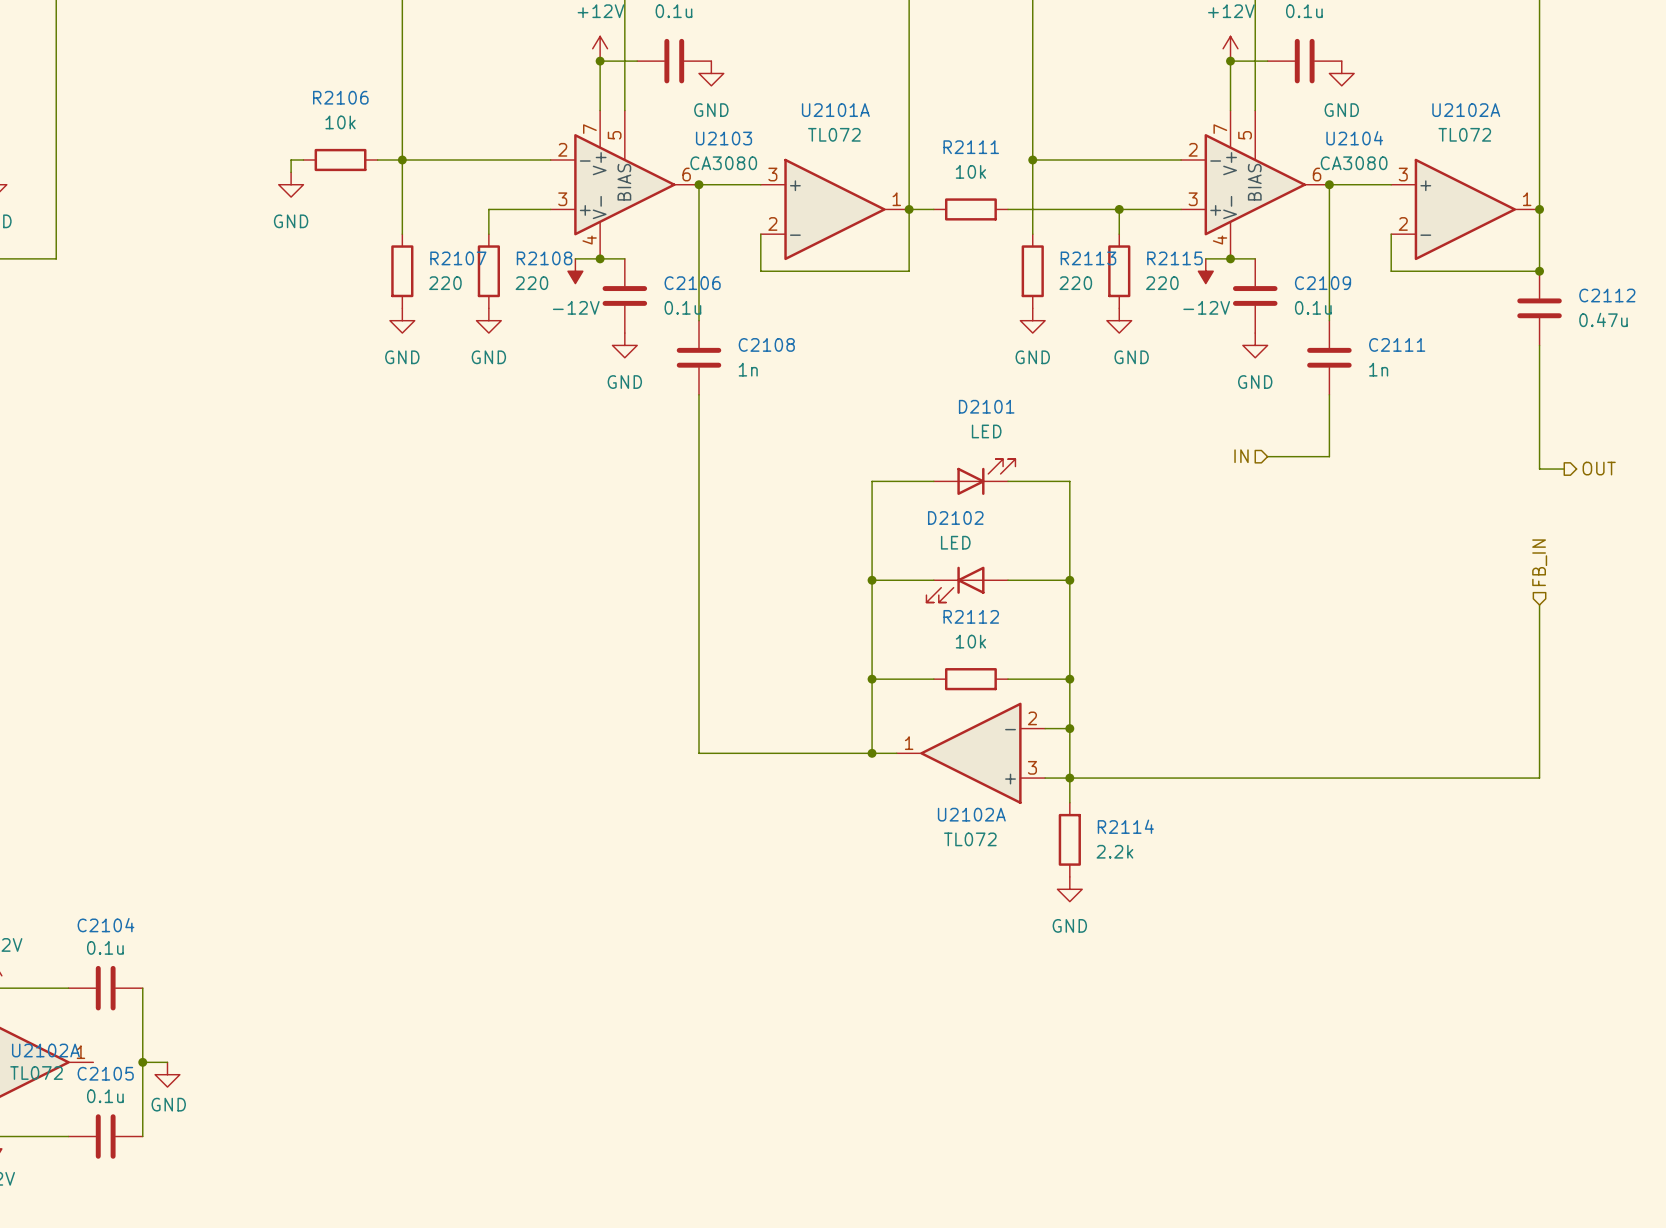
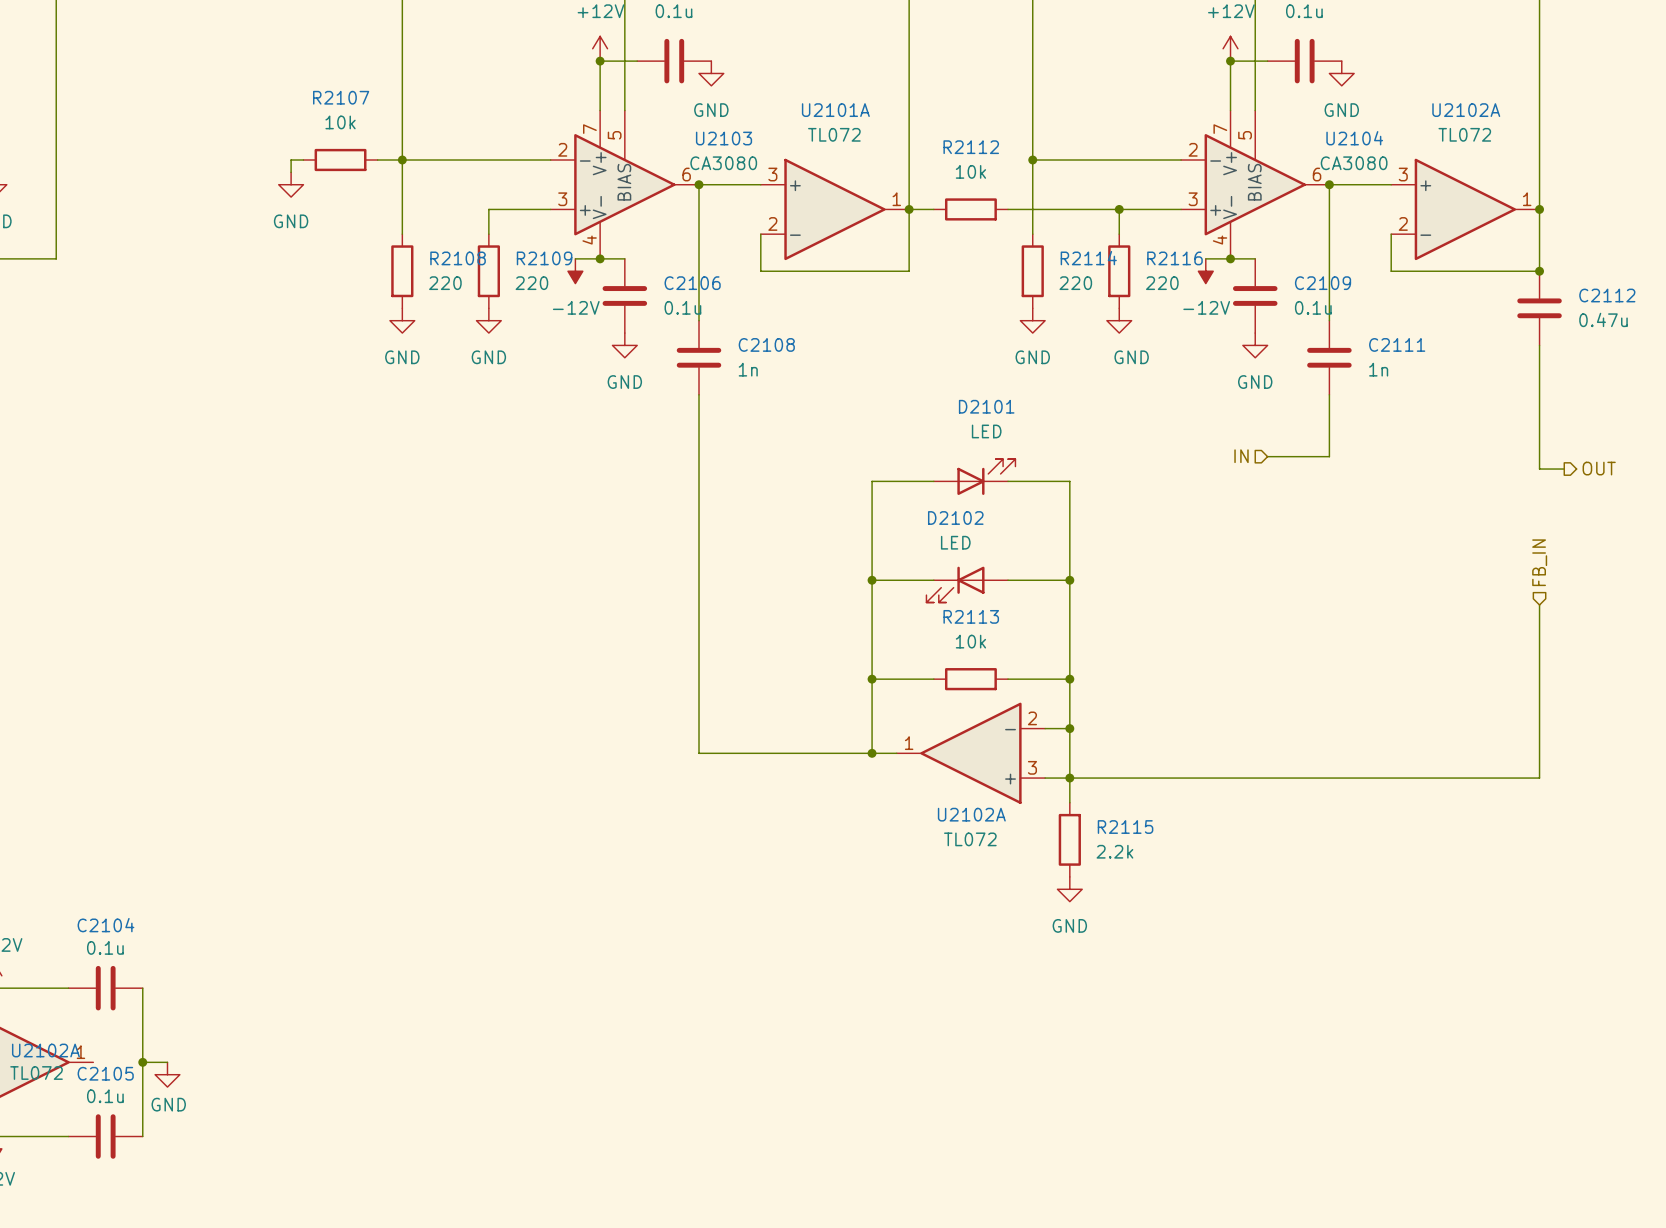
R2106 name: R2106 (340, 97) -> R2107 (341, 97)
R2111 name: R2111 (971, 147) -> R2112 (971, 147)
R2107 name: R2107 (458, 258) -> R2108 (458, 258)
R2108 name: R2108 (544, 258) -> R2109 (544, 258)
R2113 name: R2113 (1088, 258) -> R2114 (1088, 258)
R2115 name: R2115 (1174, 258) -> R2116 (1174, 258)
R2112 name: R2112 (971, 616) -> R2113 (971, 616)
R2114 name: R2114 (1125, 826) -> R2115 (1125, 827)

